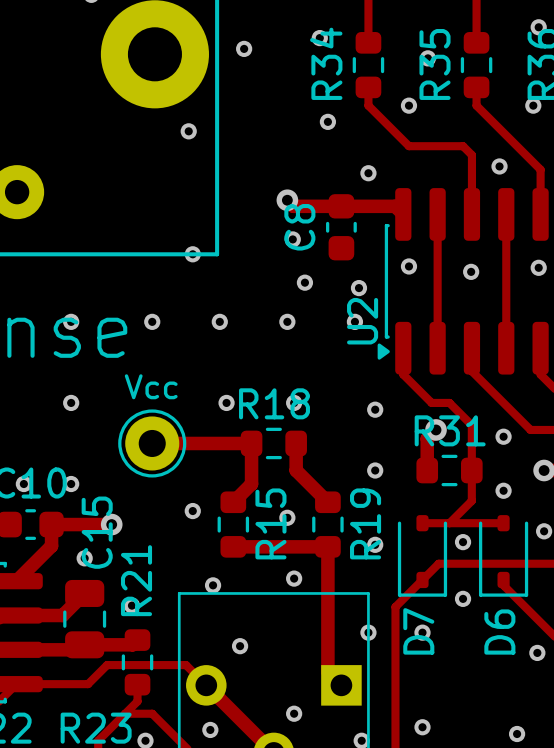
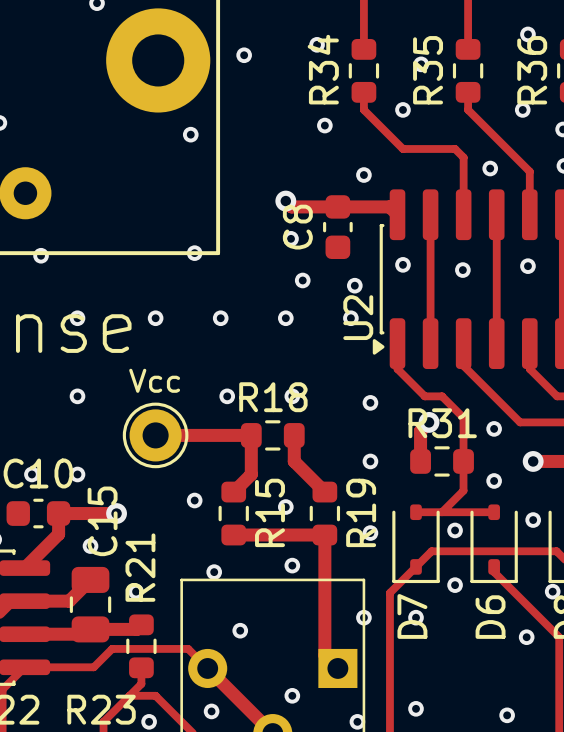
via: none -> (41, 255)

